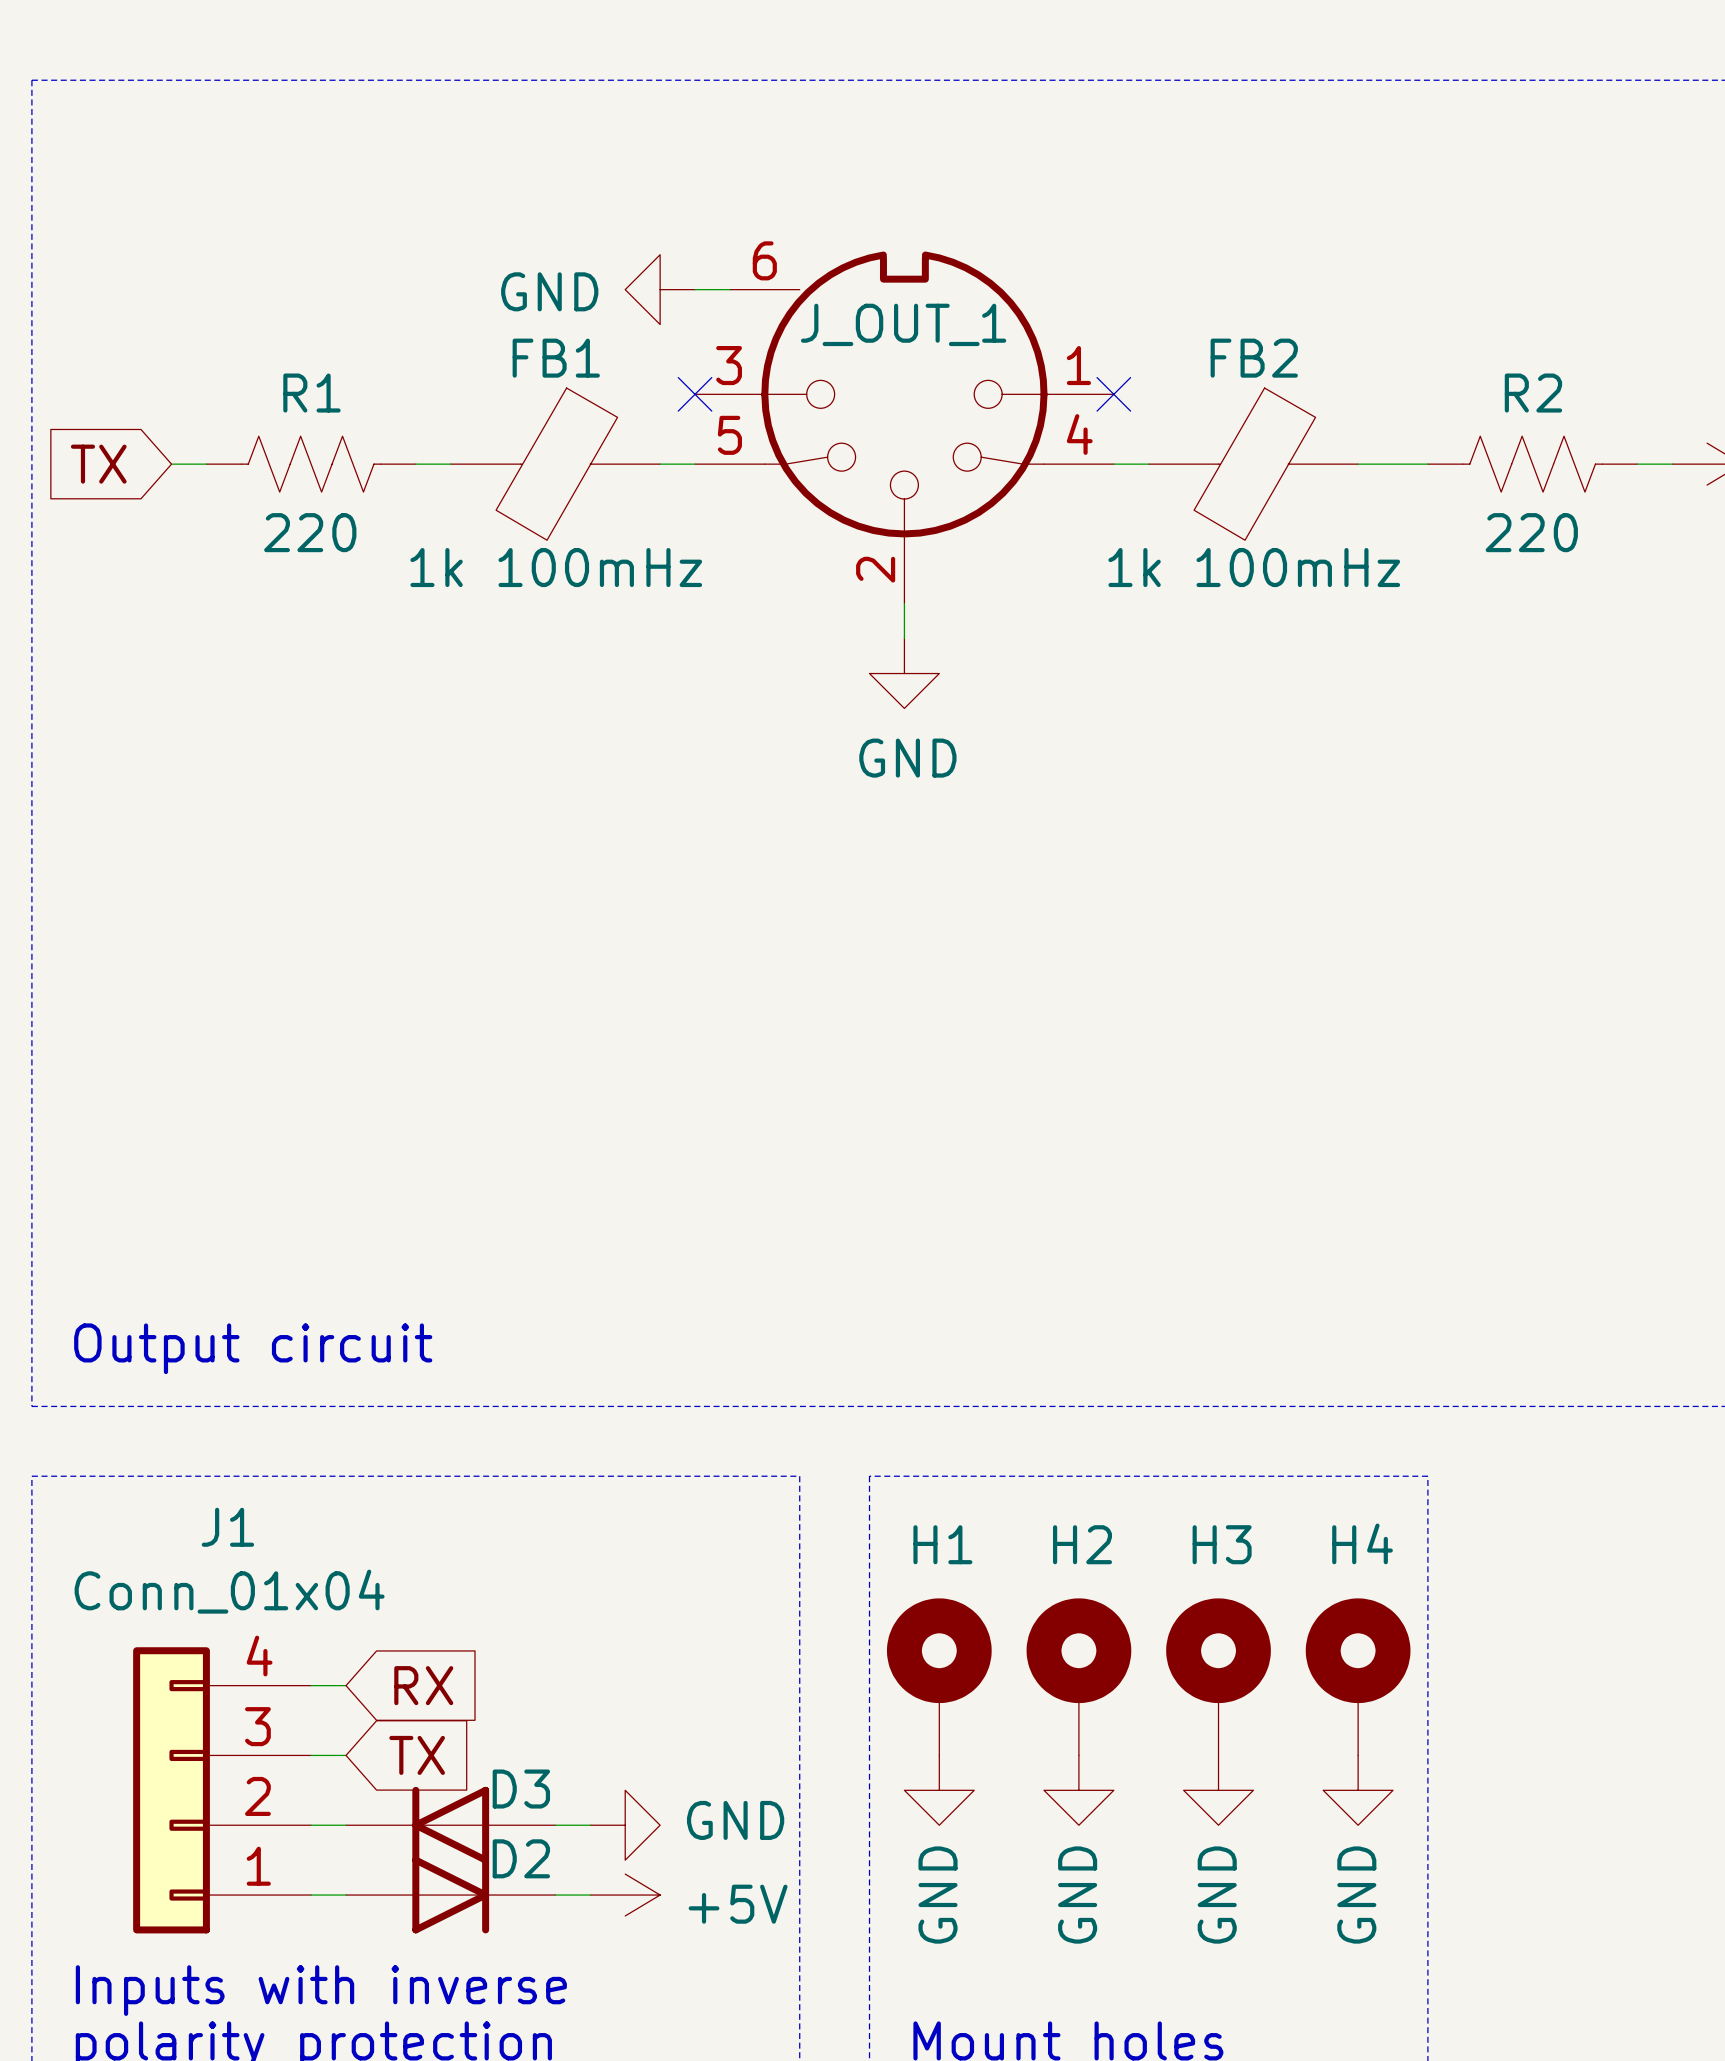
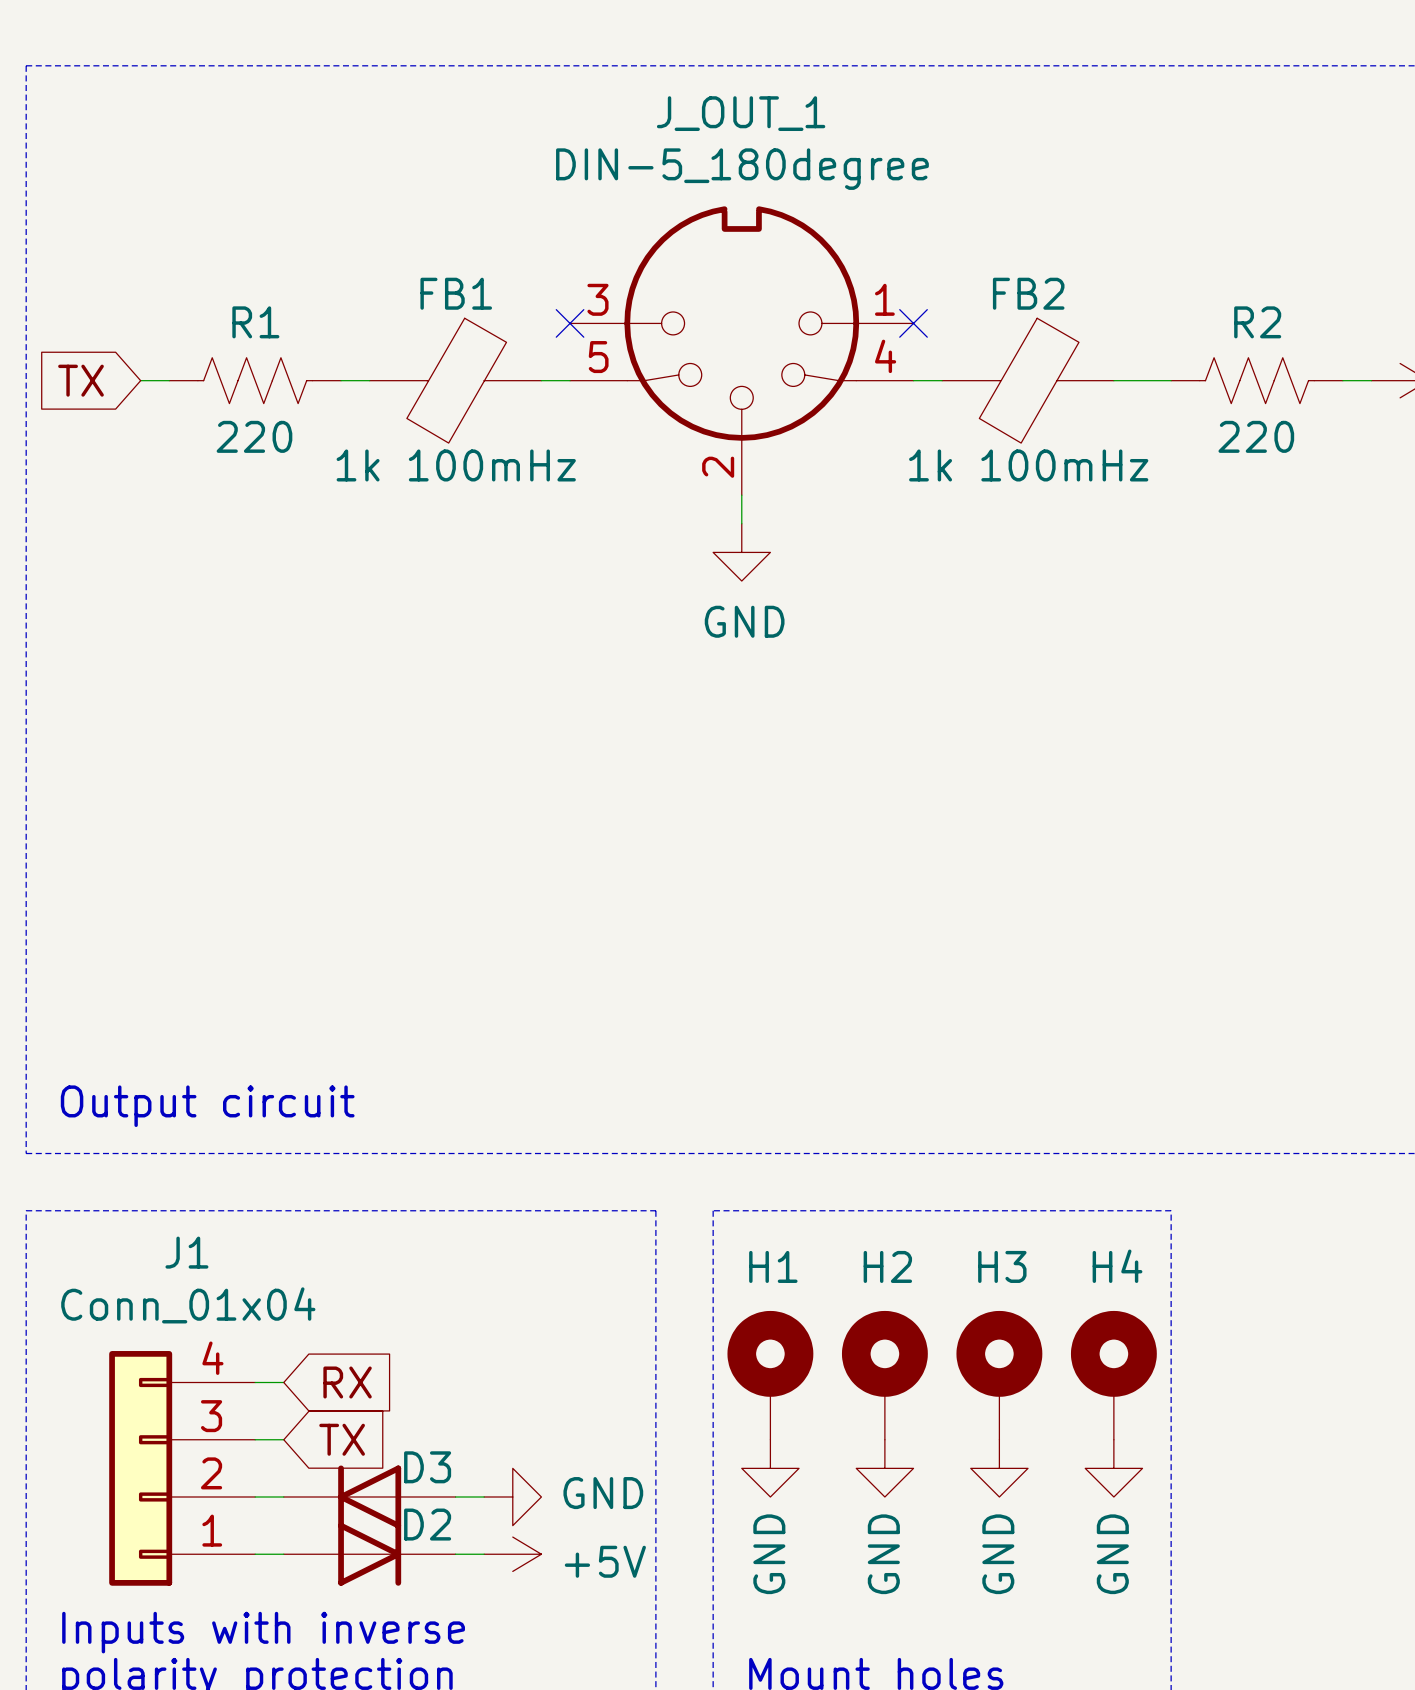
J_OUT_1 value: none -> DIN-5_180degree (742, 169)
J_OUT_1 symbol: [695, 251, 1114, 604] -> [570, 206, 914, 496]
power symbol: GND (660, 289) -> none
wire: (695, 289) (729, 289) -> none
J_OUT_1 name position: J_OUT_1 (903, 324) -> J_OUT_1 (741, 113)

